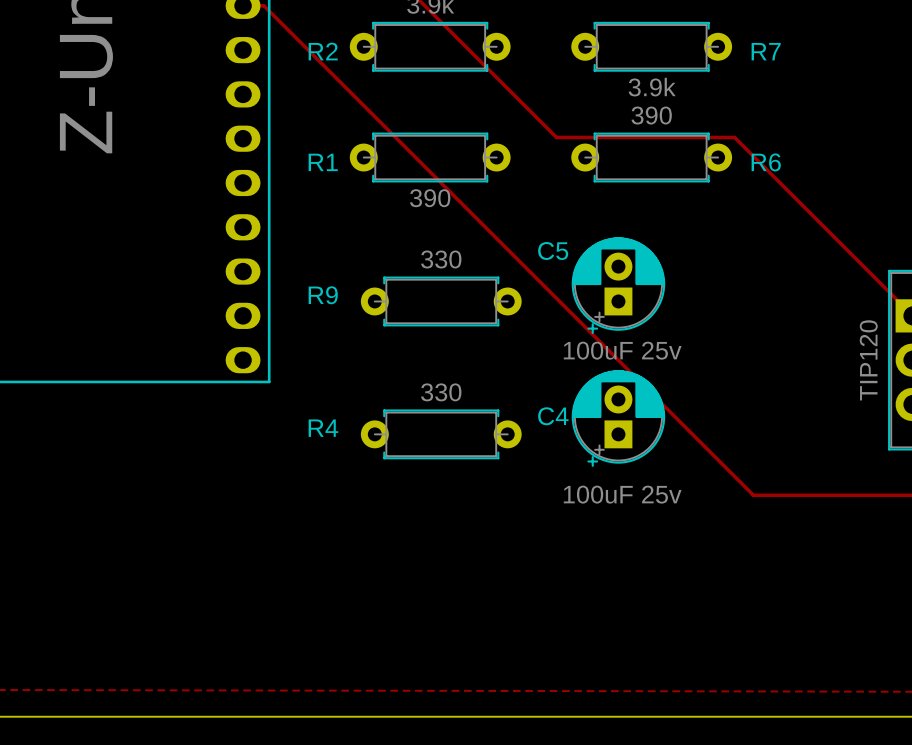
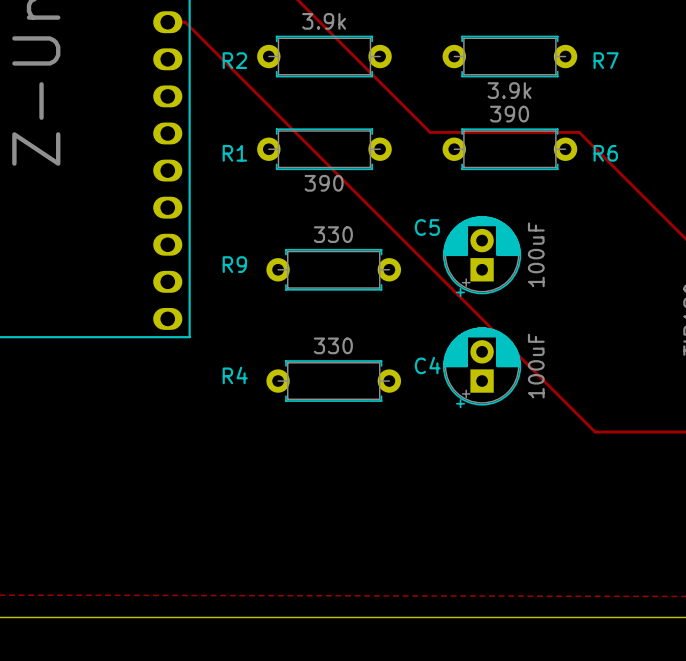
C5 value: 100uF 25v (622, 350) -> 100uF (536, 254)
C4 value: 100uF 25v (622, 494) -> 100uF (536, 366)

